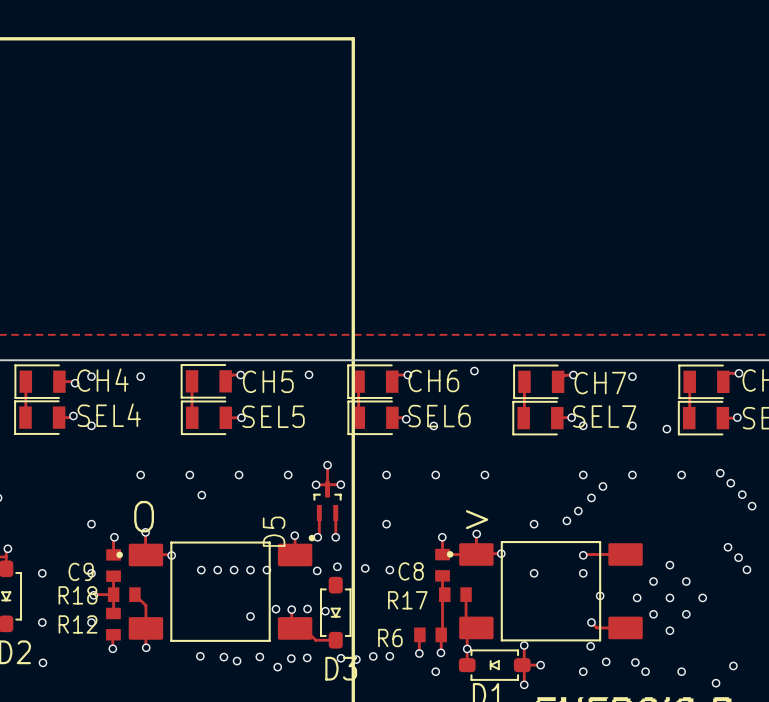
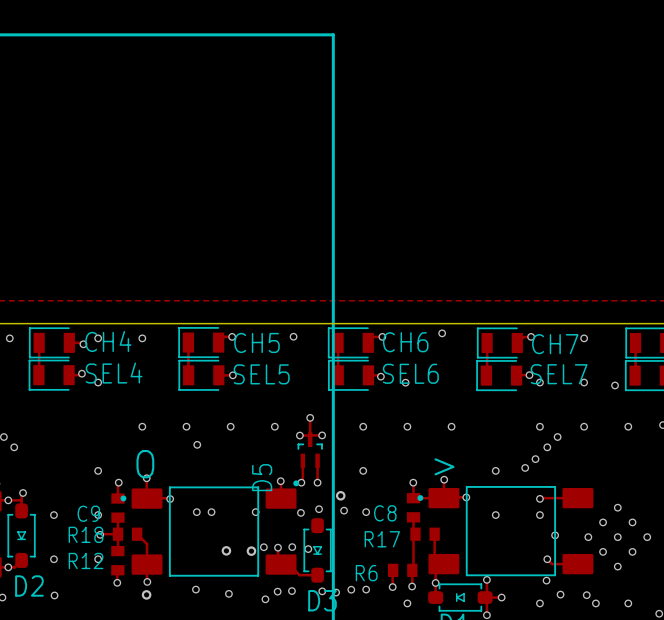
via: none -> (340, 495)
via: (234, 570) -> none
via: (250, 570) -> none
via: none -> (226, 550)
via: none -> (251, 551)
via: (250, 616) -> none
via: (259, 656) -> none
via: (223, 657) -> none
via: none -> (146, 594)

